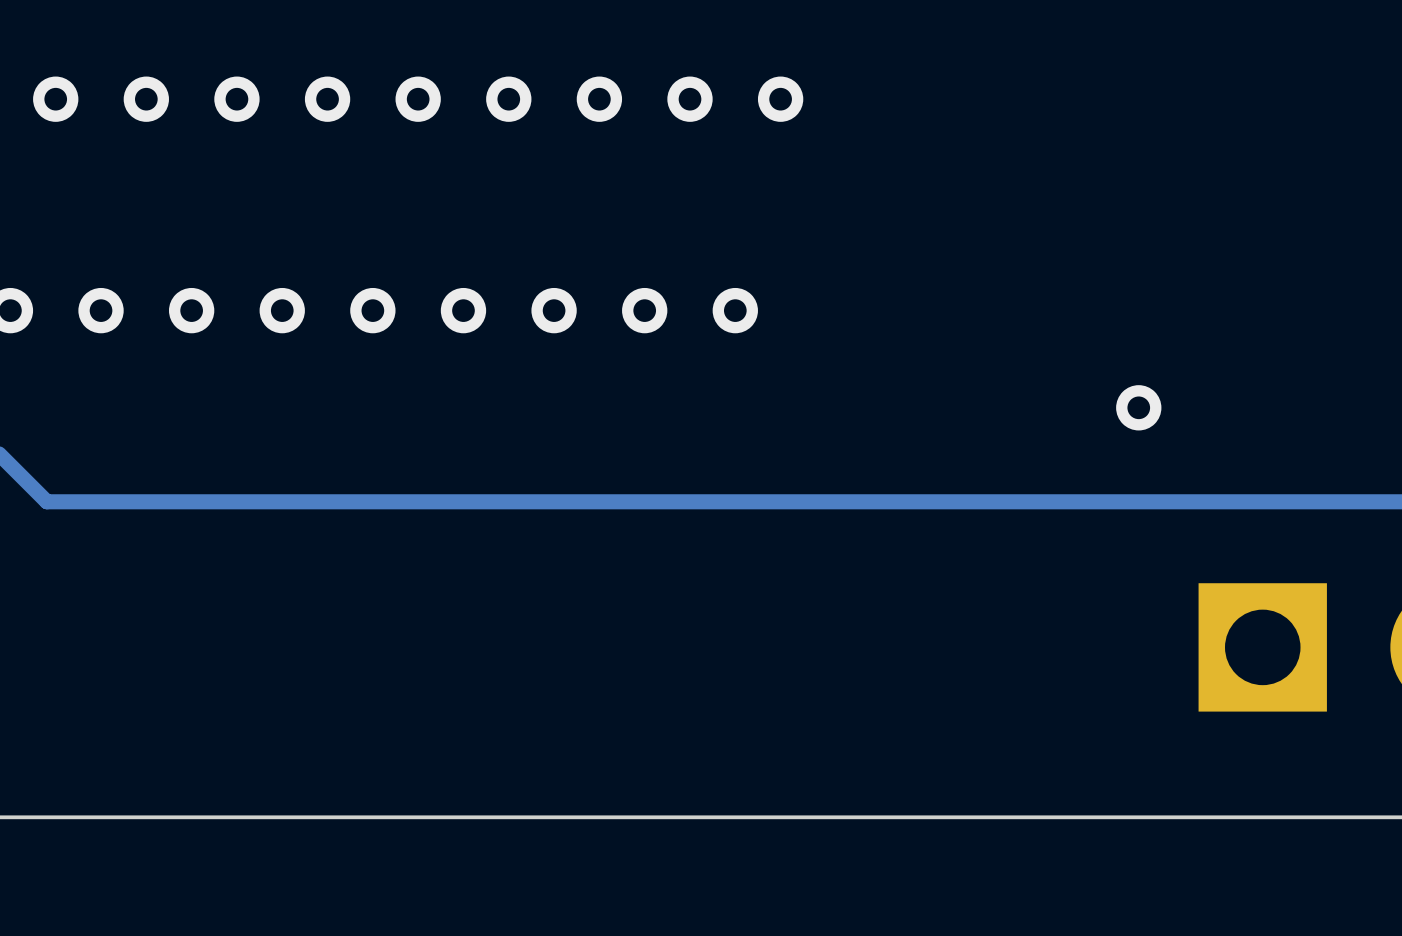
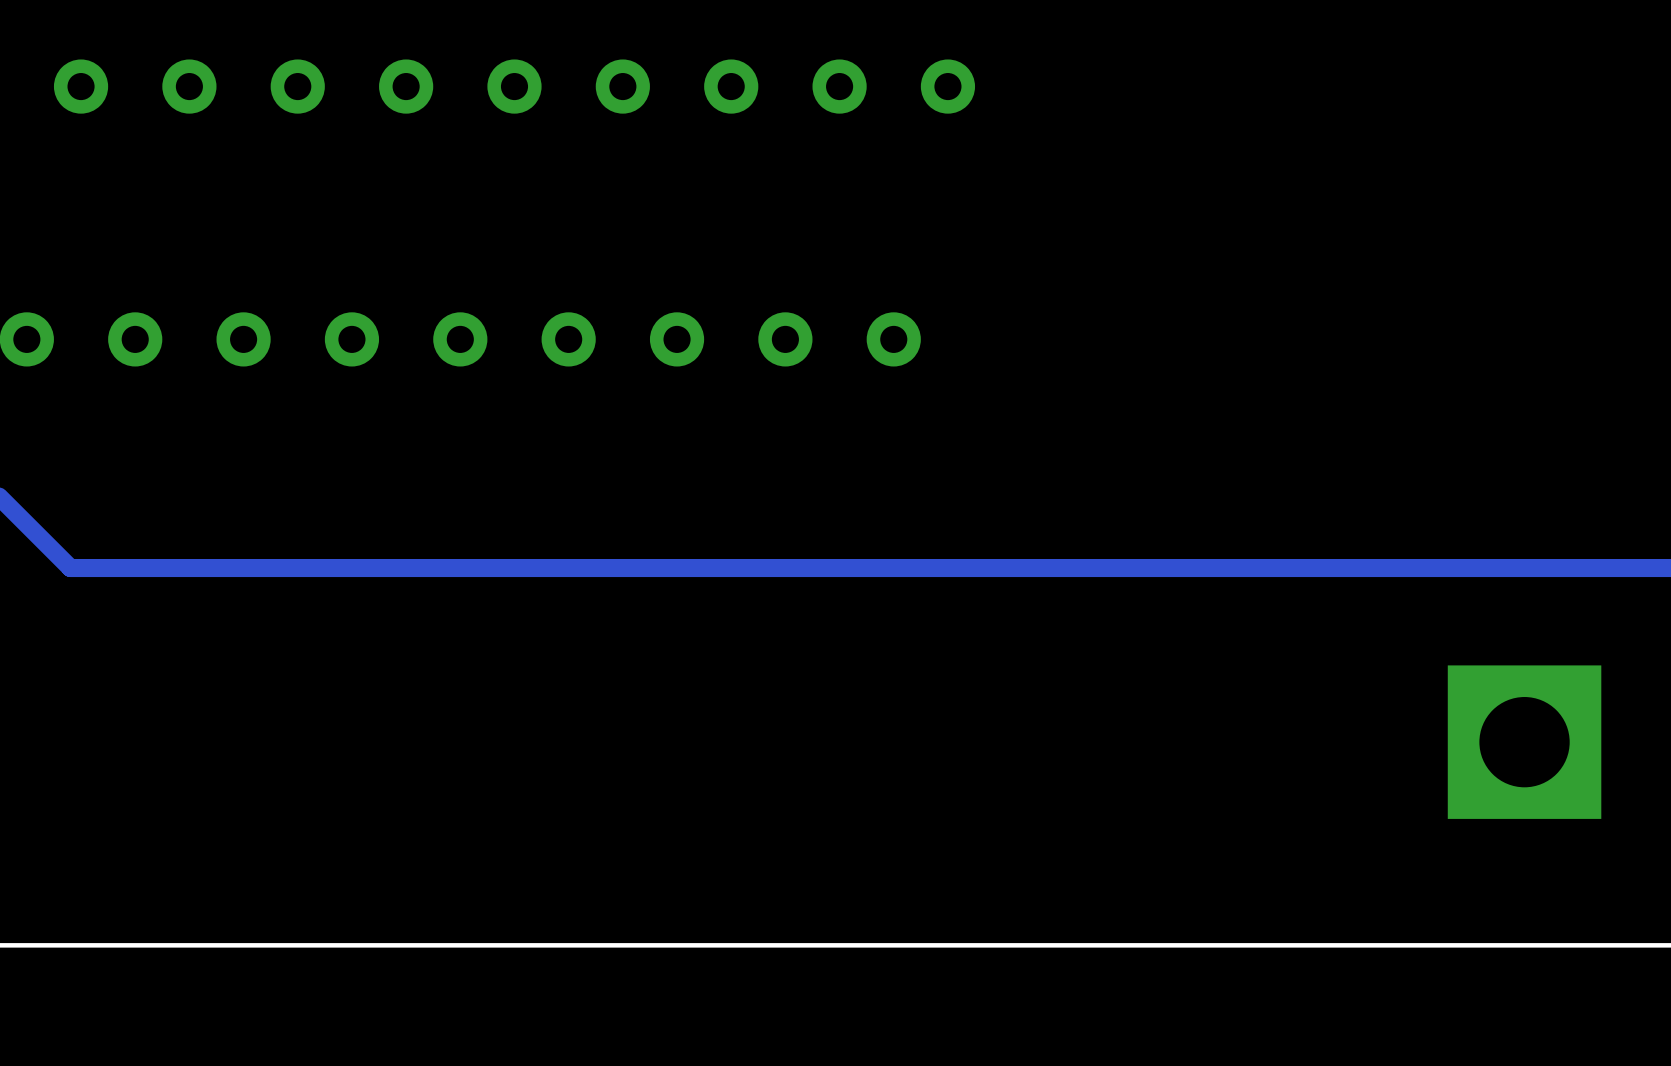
via: (1138, 407) -> none

